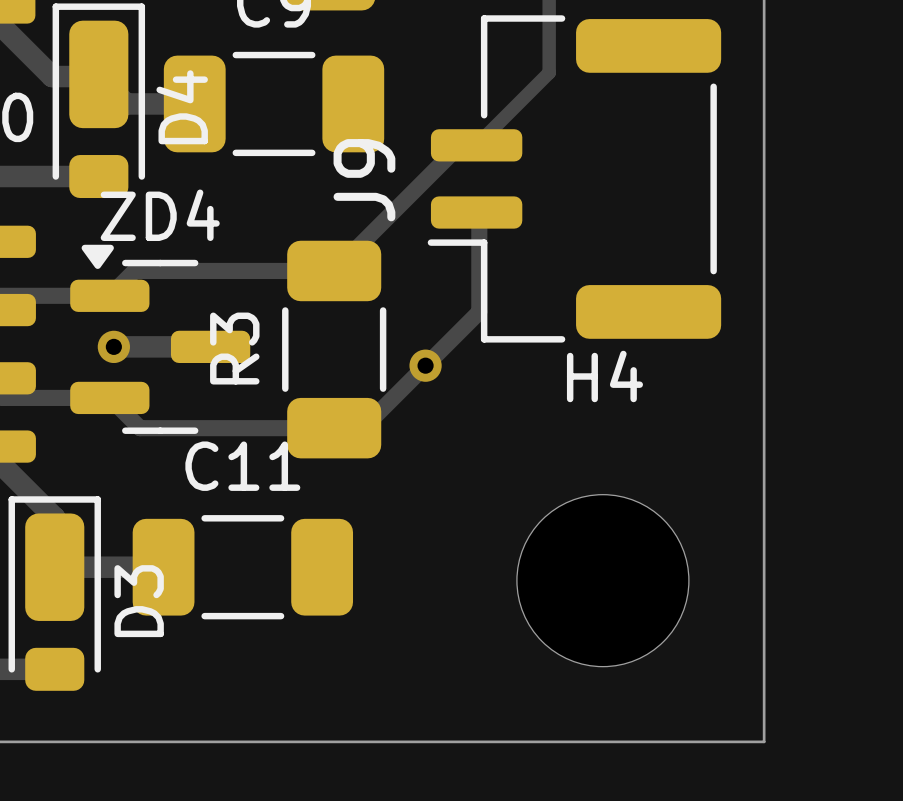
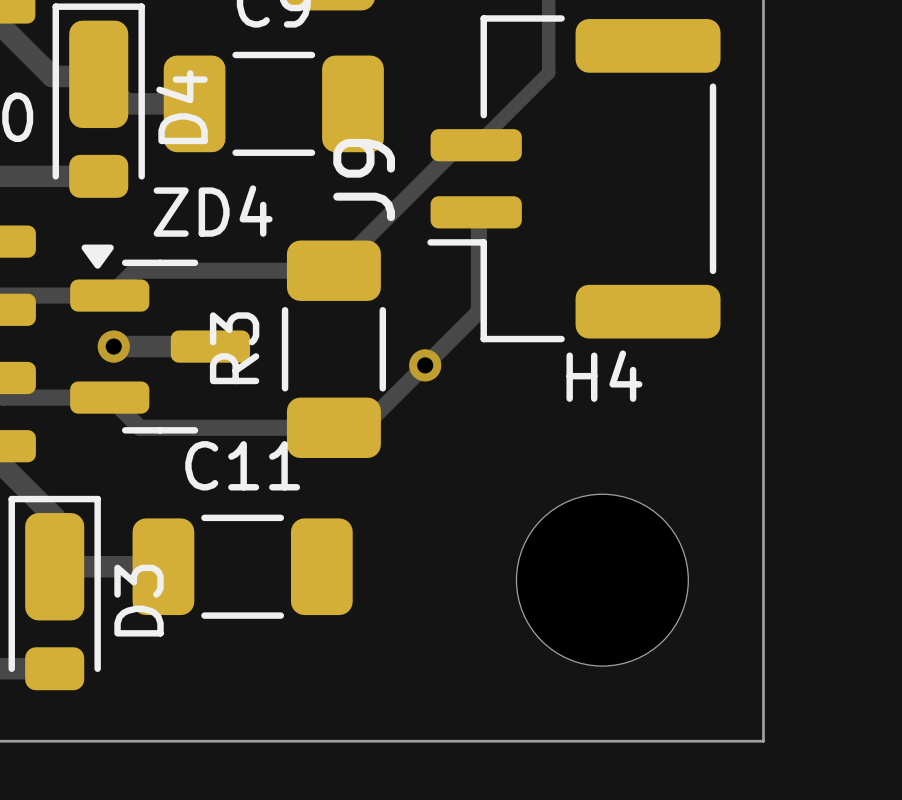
ZD4 name position: ZD4 (160, 215) -> ZD4 (213, 211)

